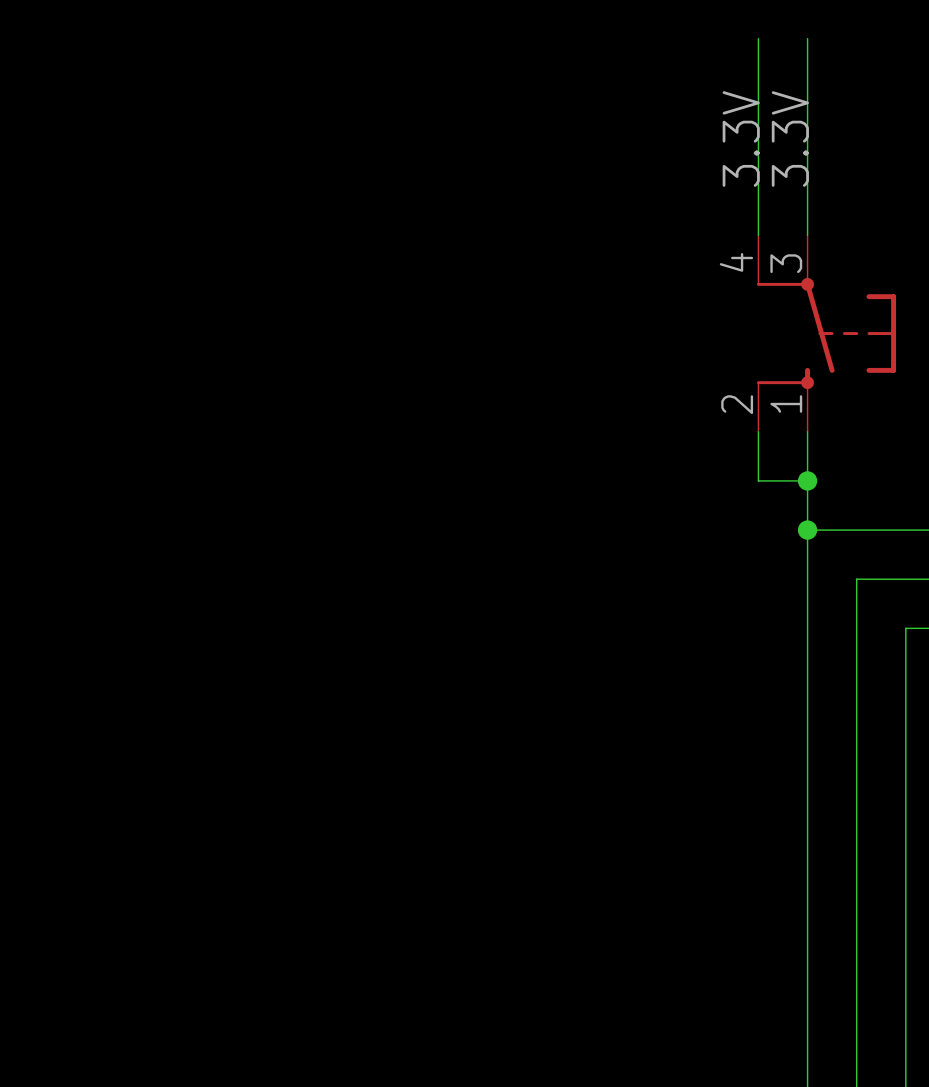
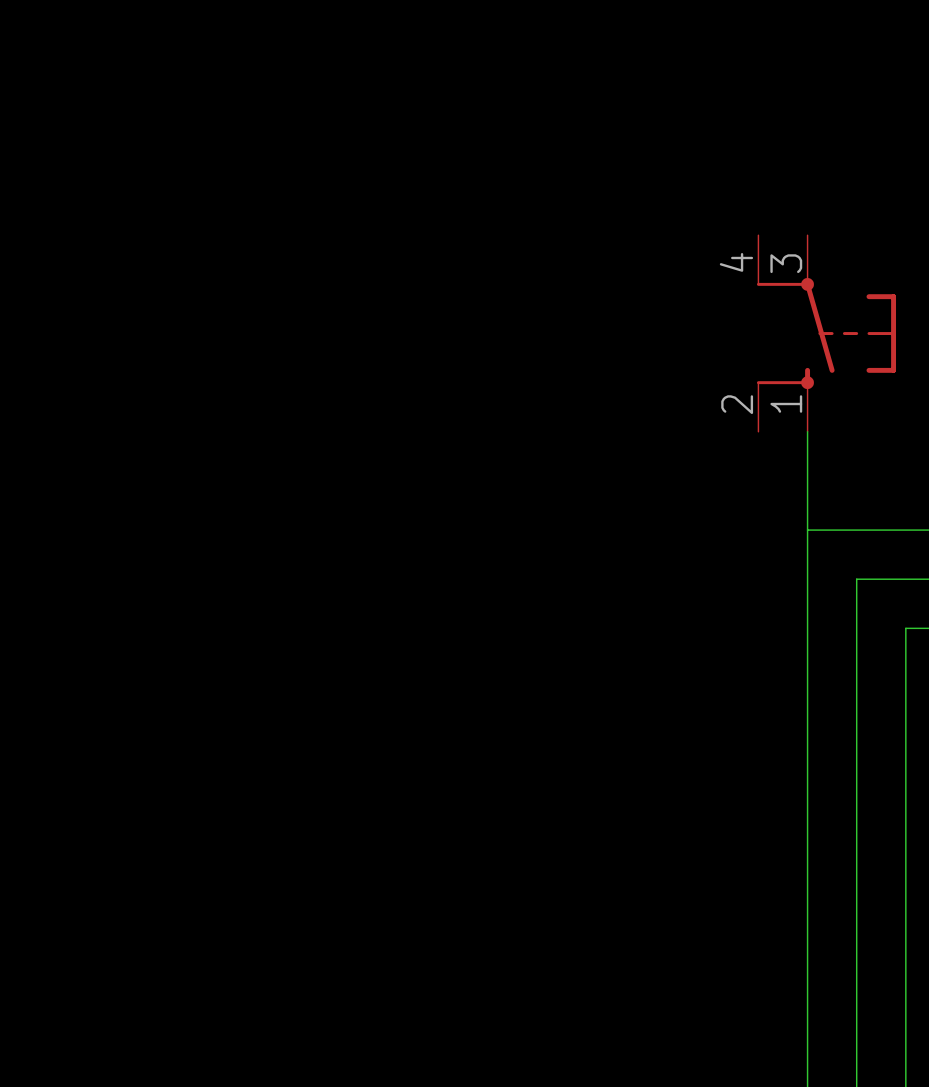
wire: (758, 38) (758, 235) -> none
wire: (807, 38) (807, 235) -> none
label: 3.3V (741, 139) -> none
label: 3.3V (790, 139) -> none
wire: (758, 431) (758, 480) (807, 480) -> none
junction: (807, 480) -> none
junction: (807, 530) -> none

